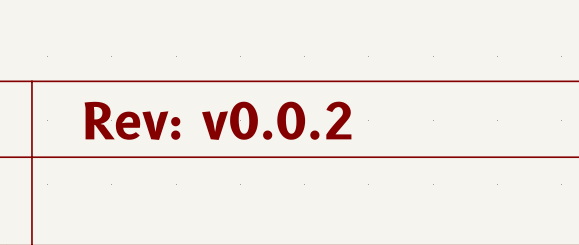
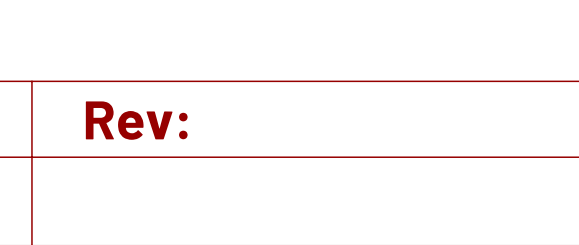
title block: Rev: v0.0.2 (218, 120) -> Rev: (136, 120)

